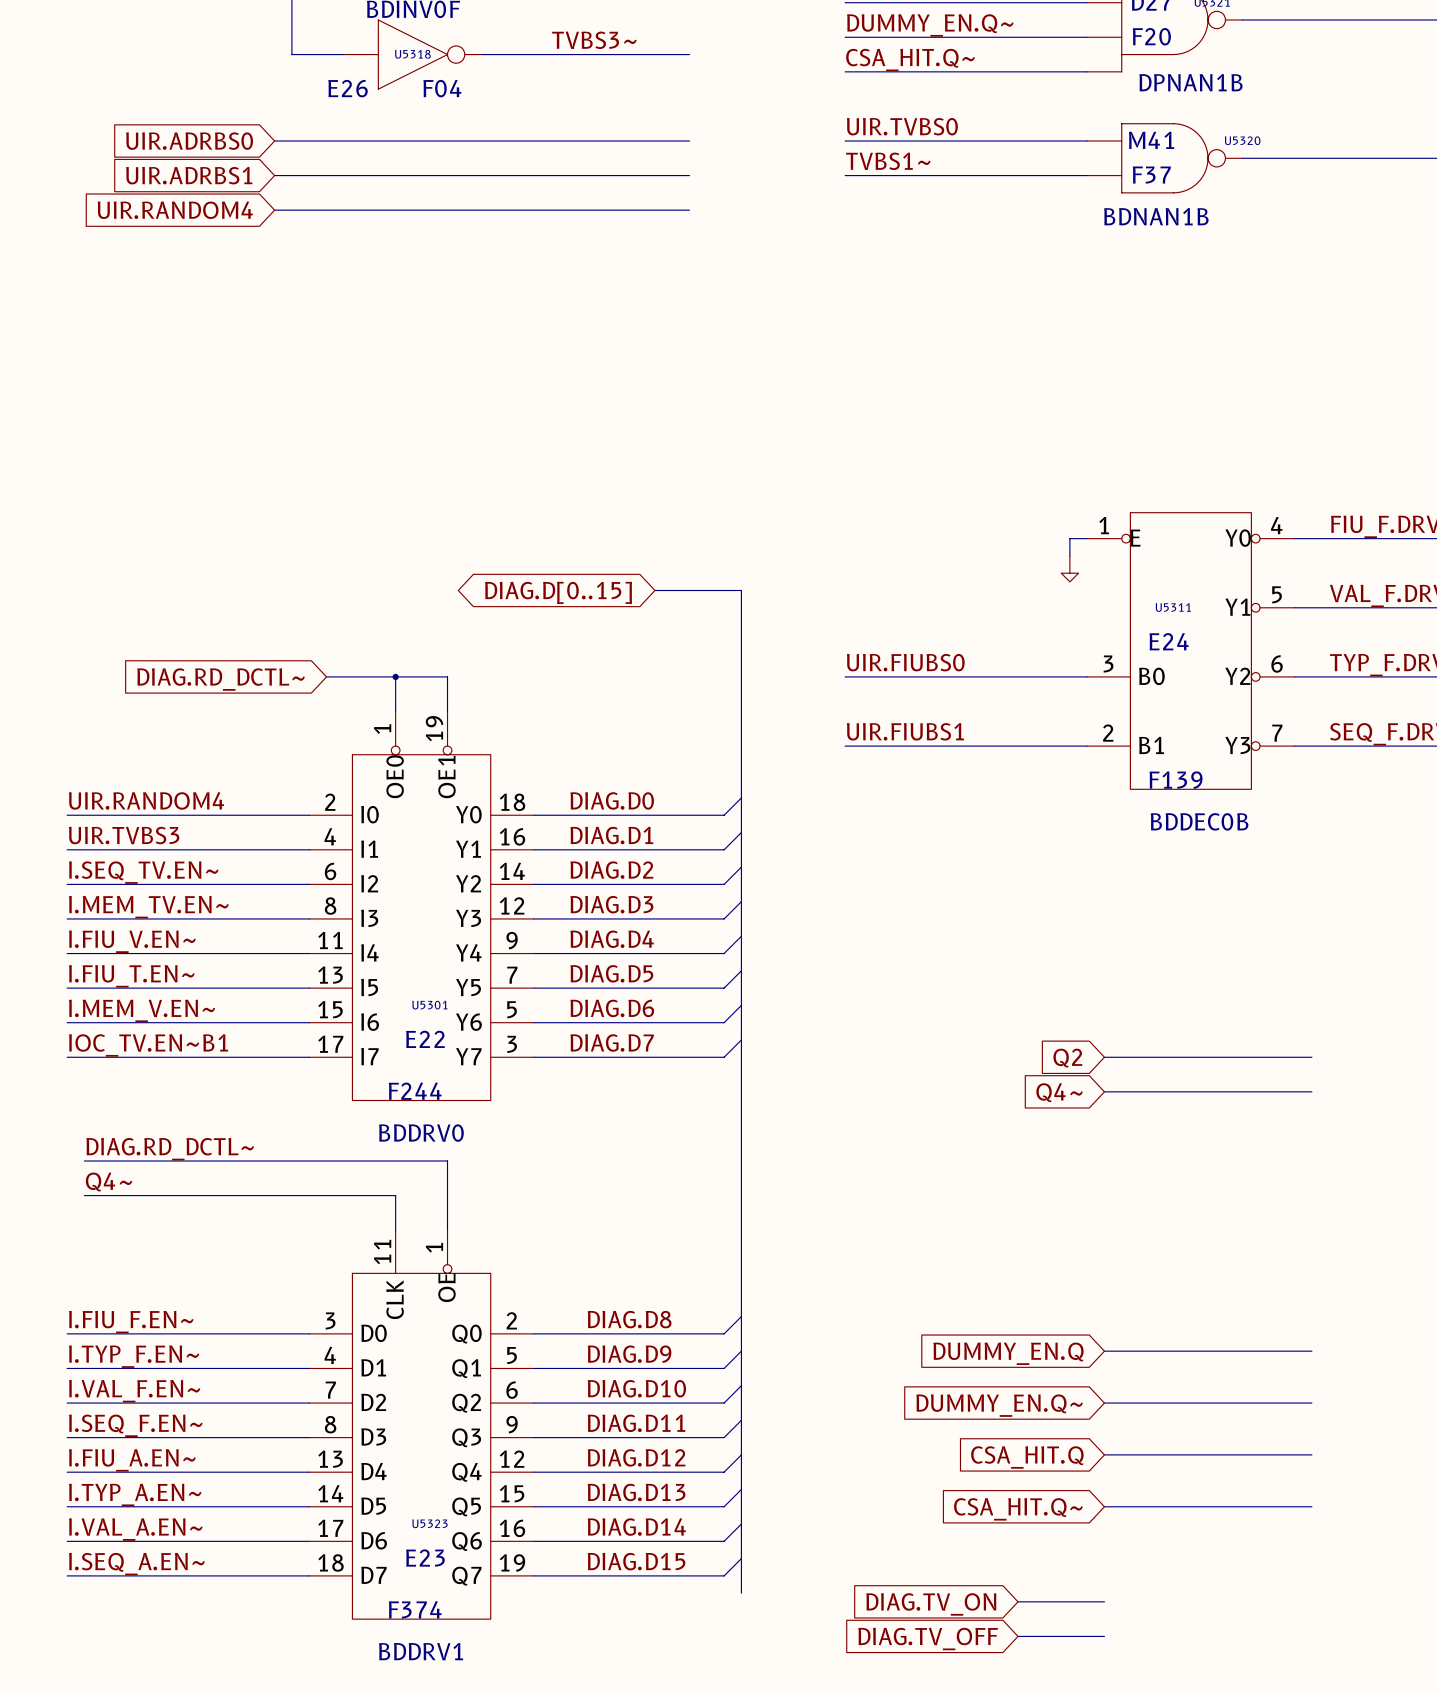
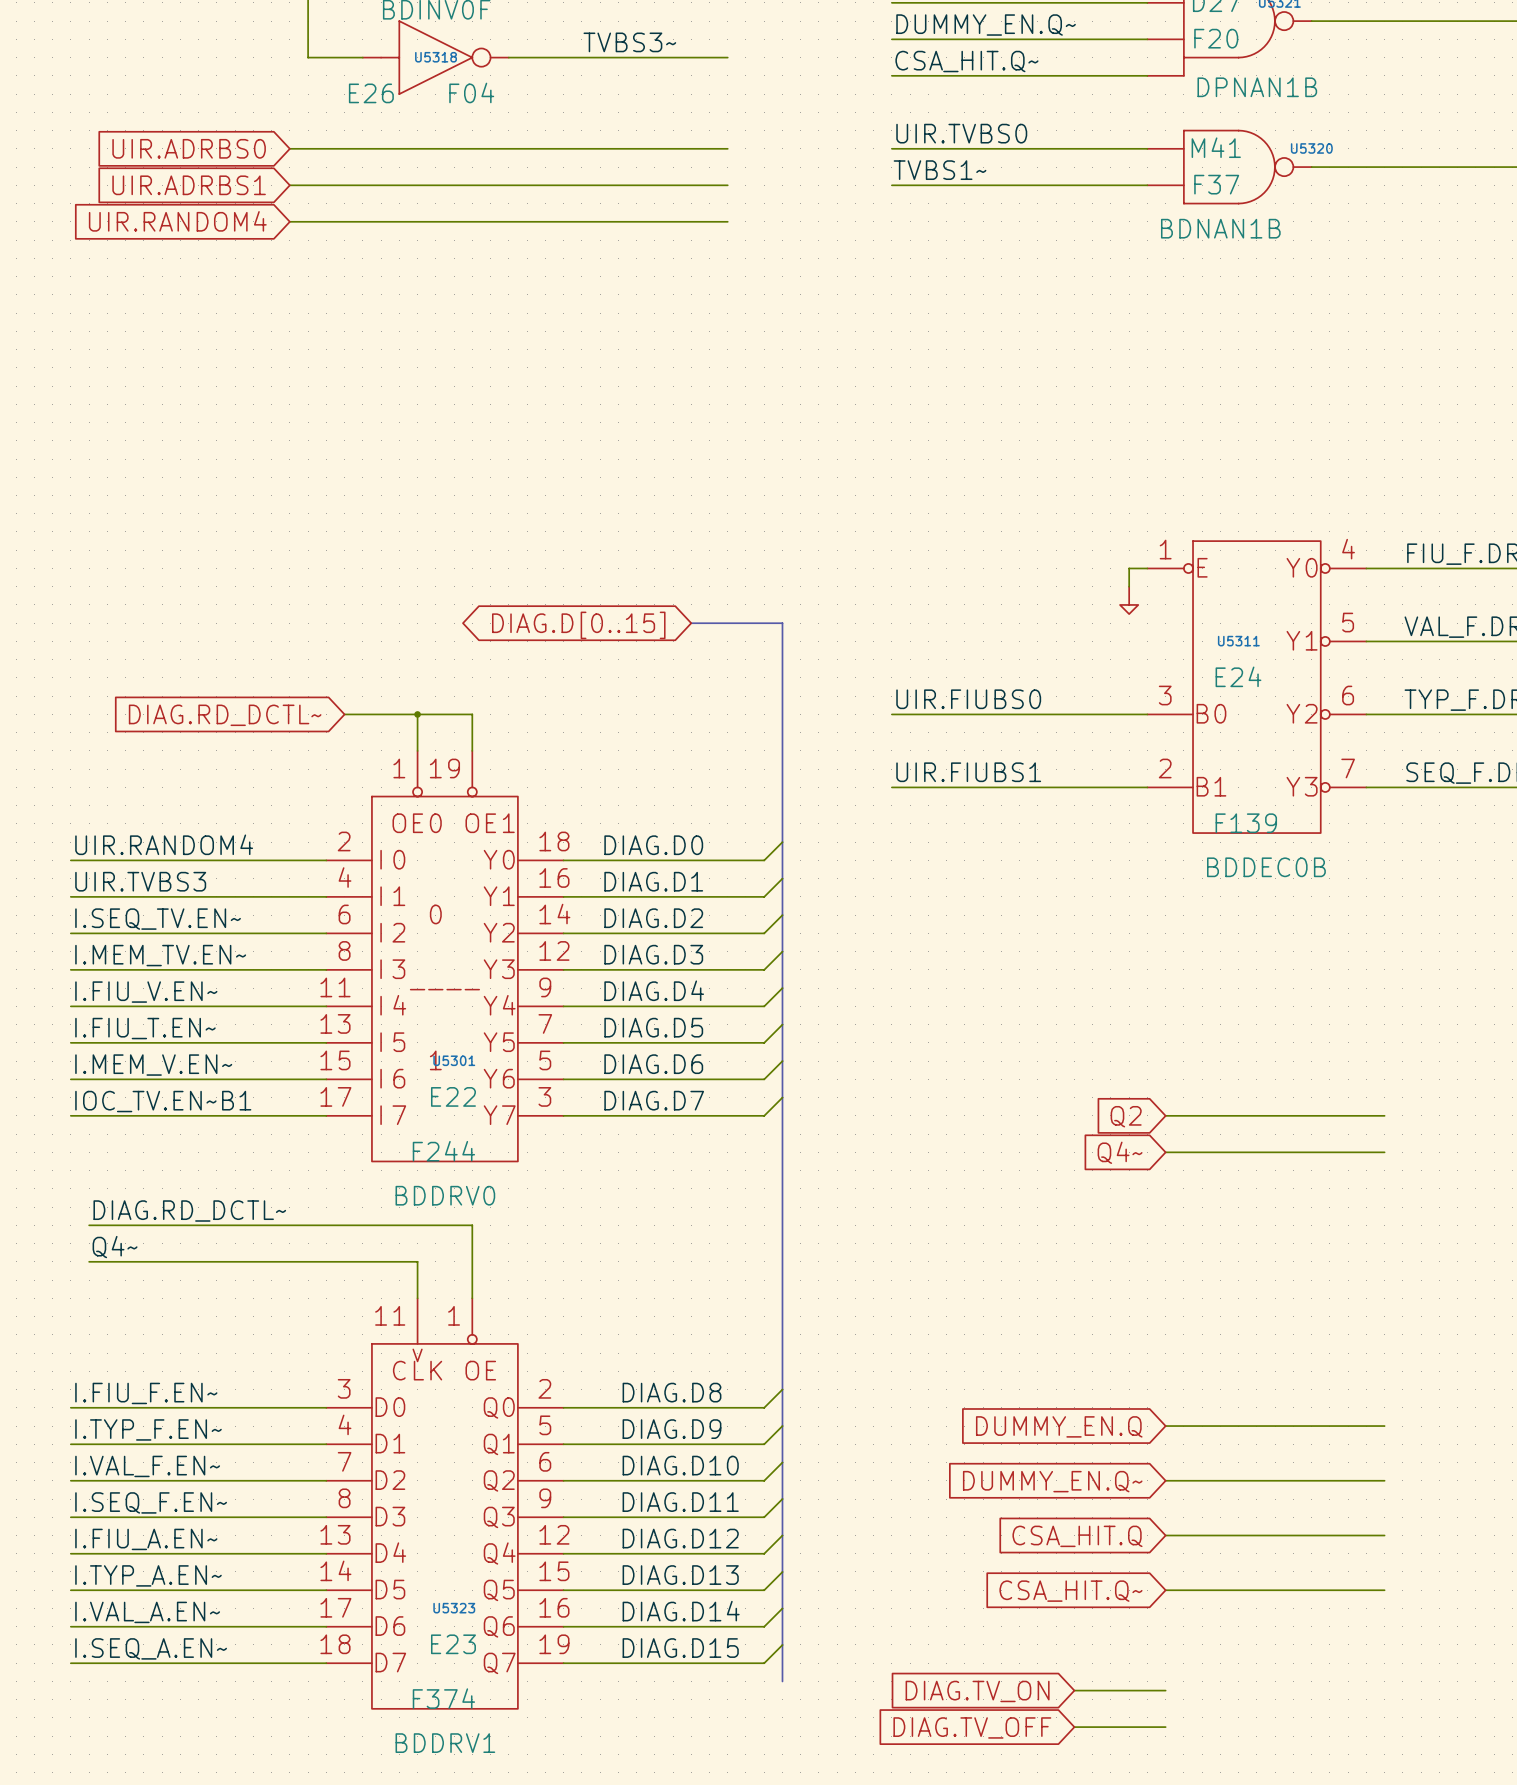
U5311 symbol: [1087, 512, 1295, 790] -> [1147, 541, 1367, 834]
U5301 symbol: [309, 711, 534, 1101] -> [326, 750, 564, 1162]
U5323 symbol: [309, 1230, 534, 1620] -> [326, 1298, 564, 1709]

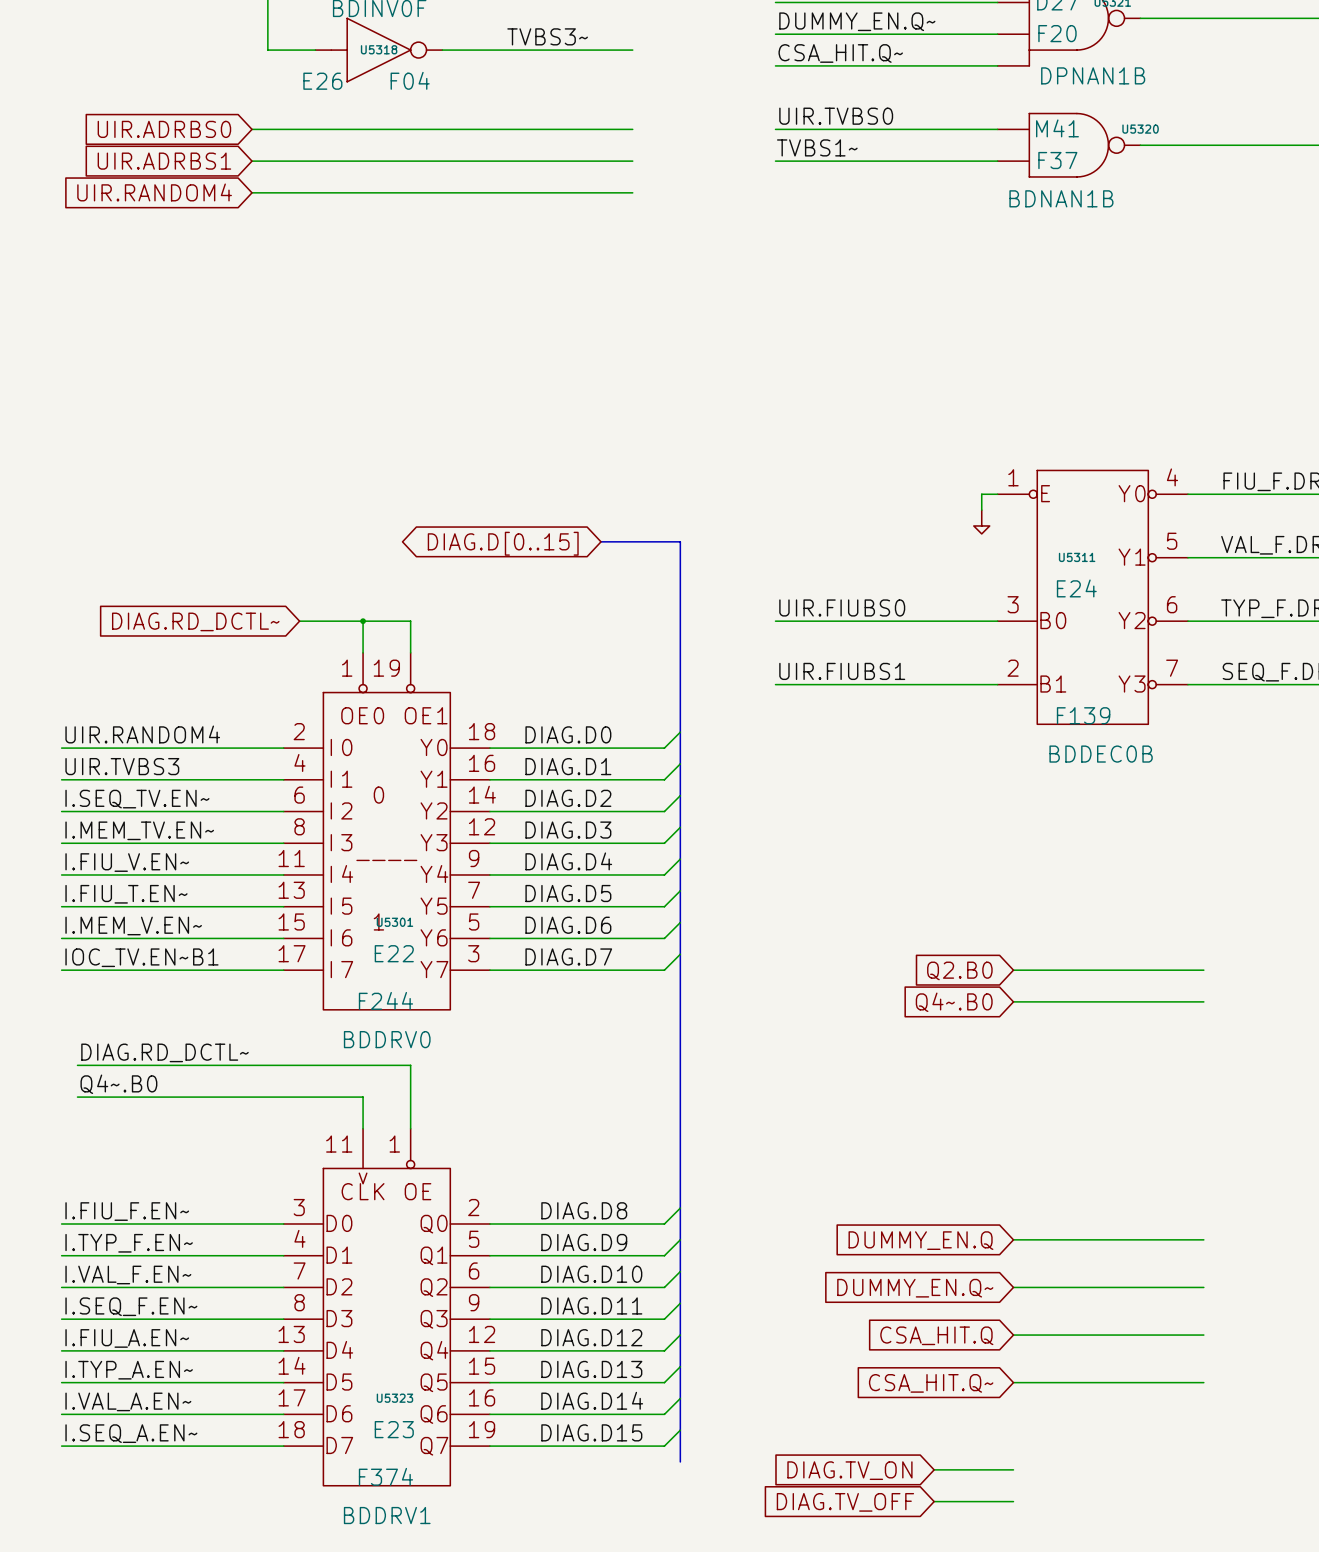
global label: Q2 (1126, 1116) -> Q2.B0 (959, 970)
global label: Q4~ (1120, 1152) -> Q4~.B0 (954, 1002)
label: Q4~ (115, 1247) -> Q4~.B0 (118, 1084)

